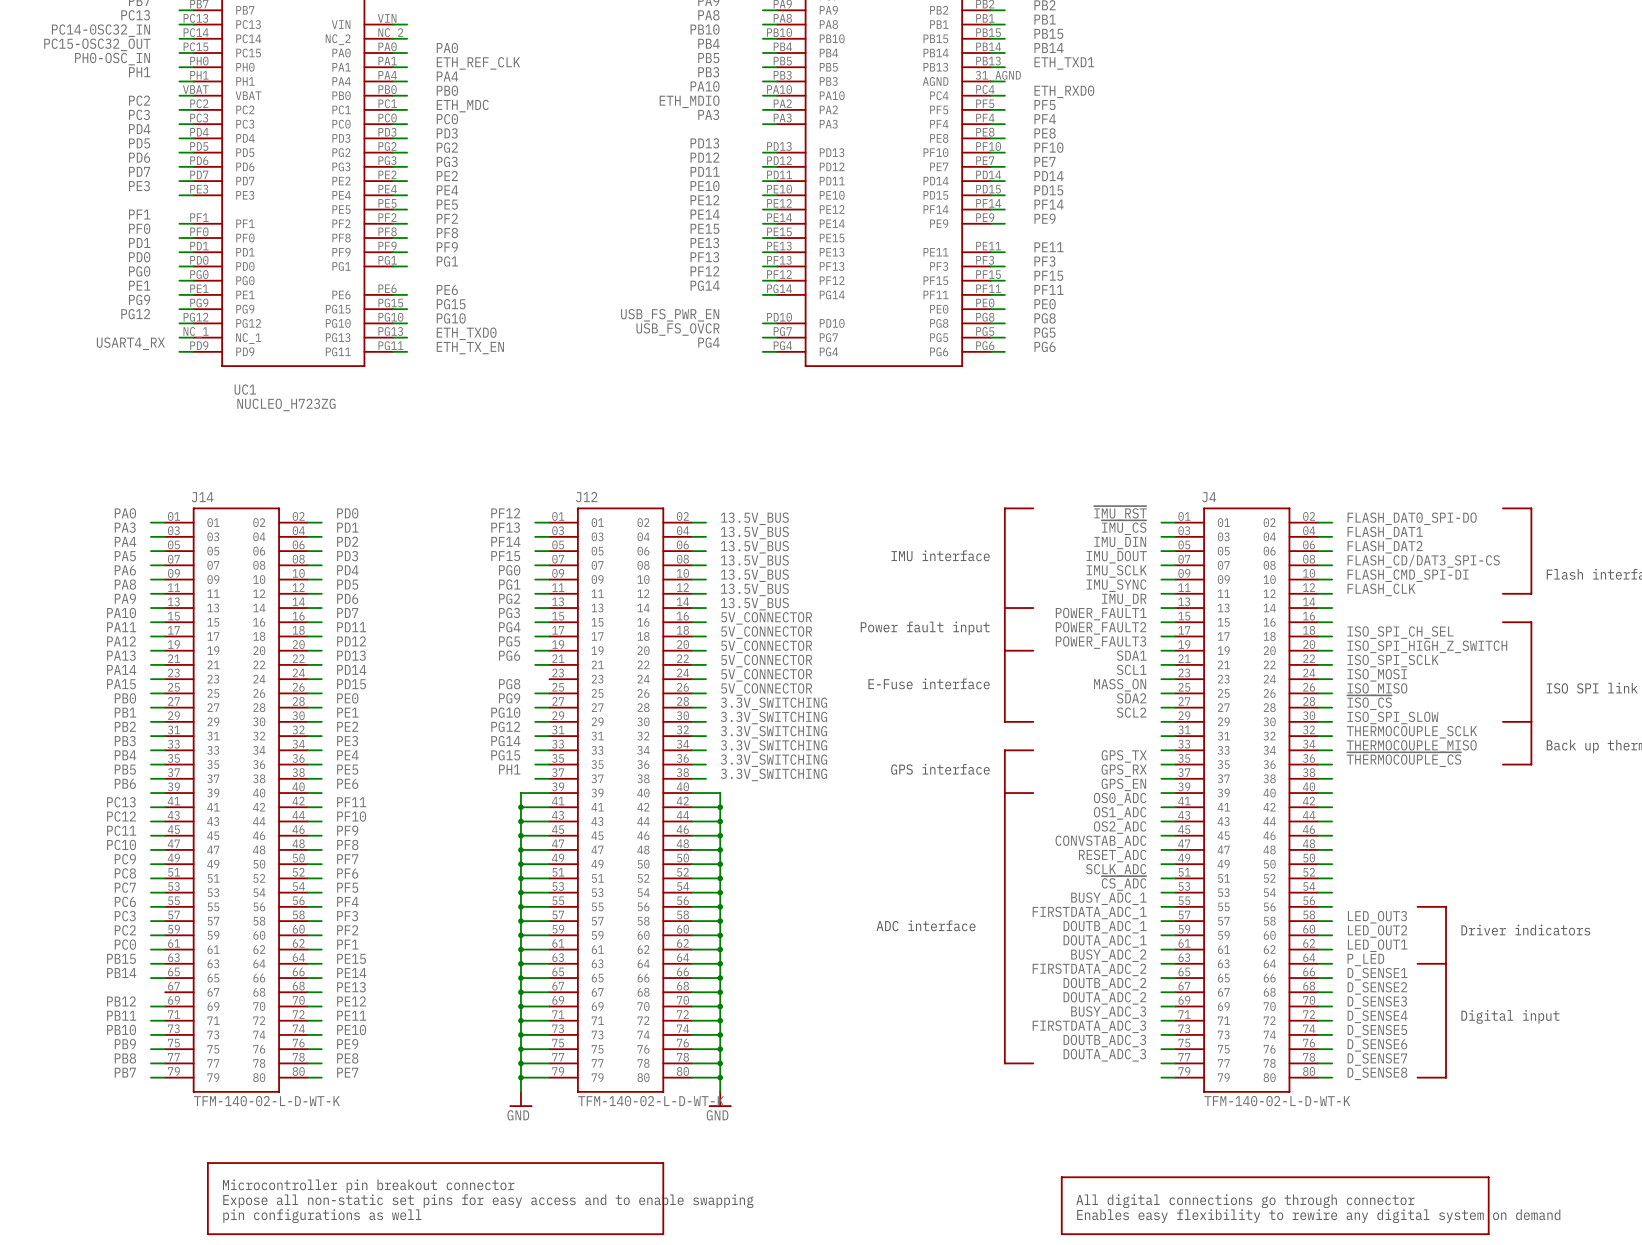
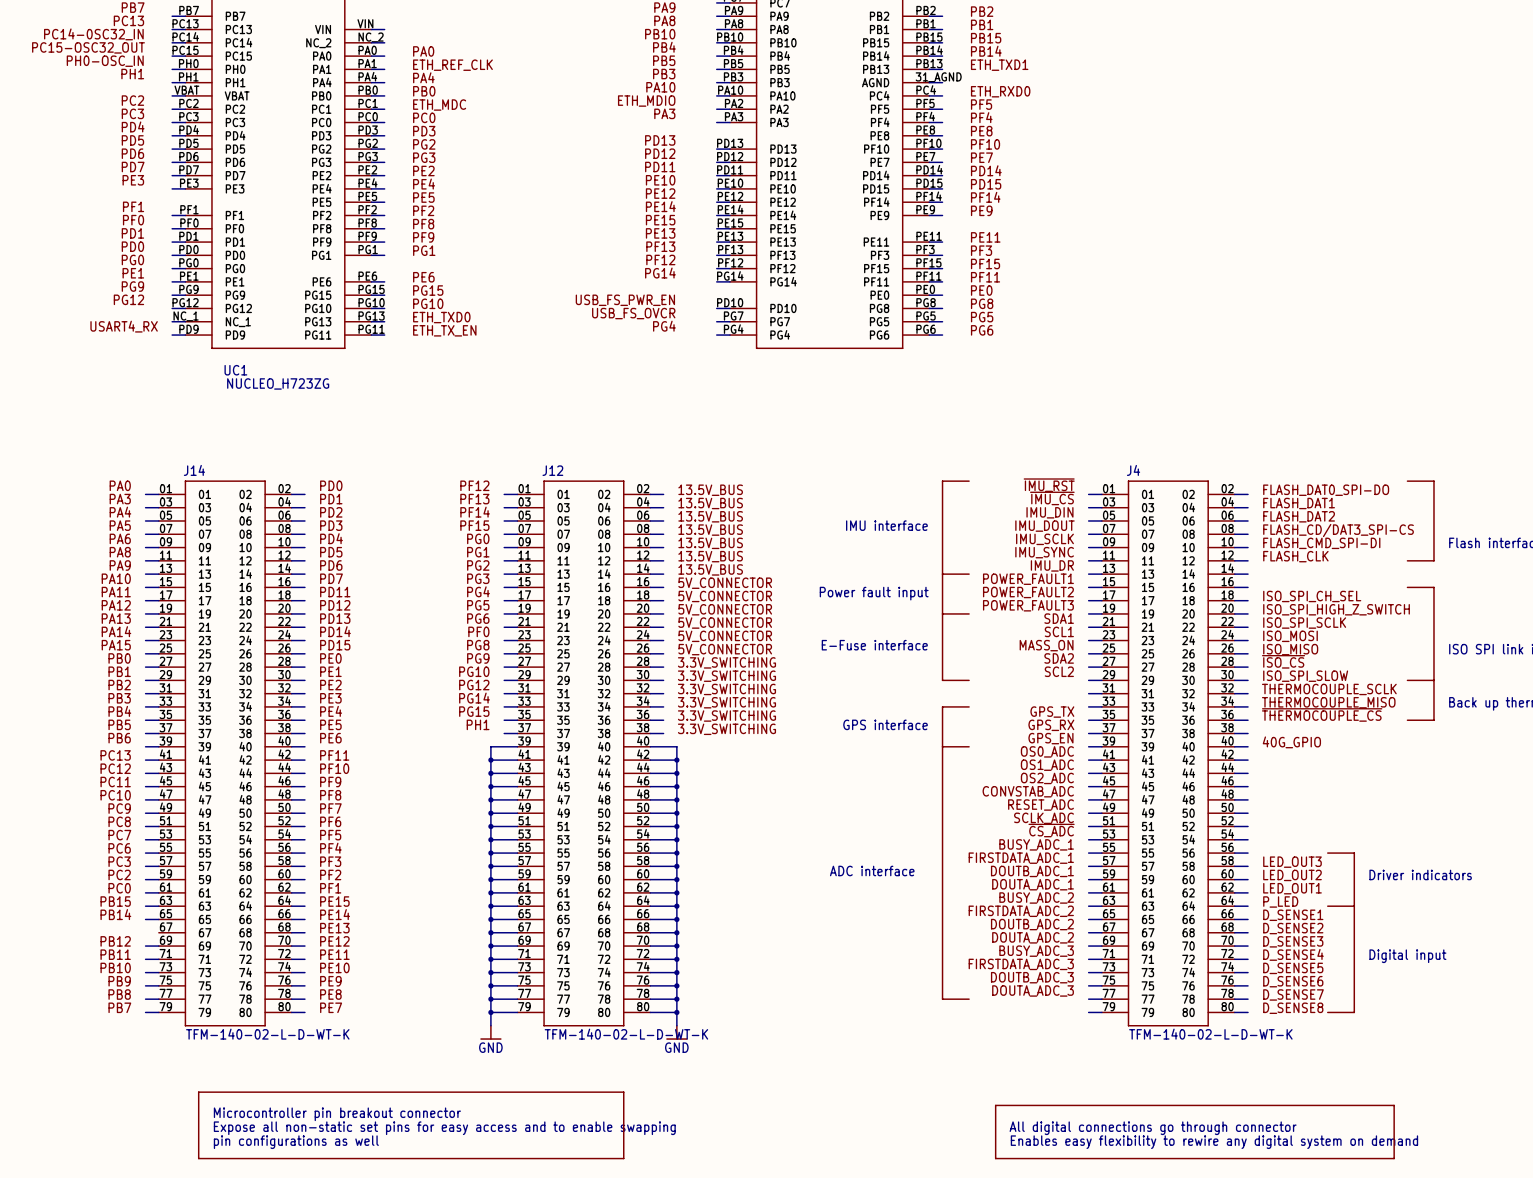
label: none -> PF0 (478, 631)
wire: none -> (504, 640) (517, 640)
label: none -> 40G_GPIO (1291, 742)

